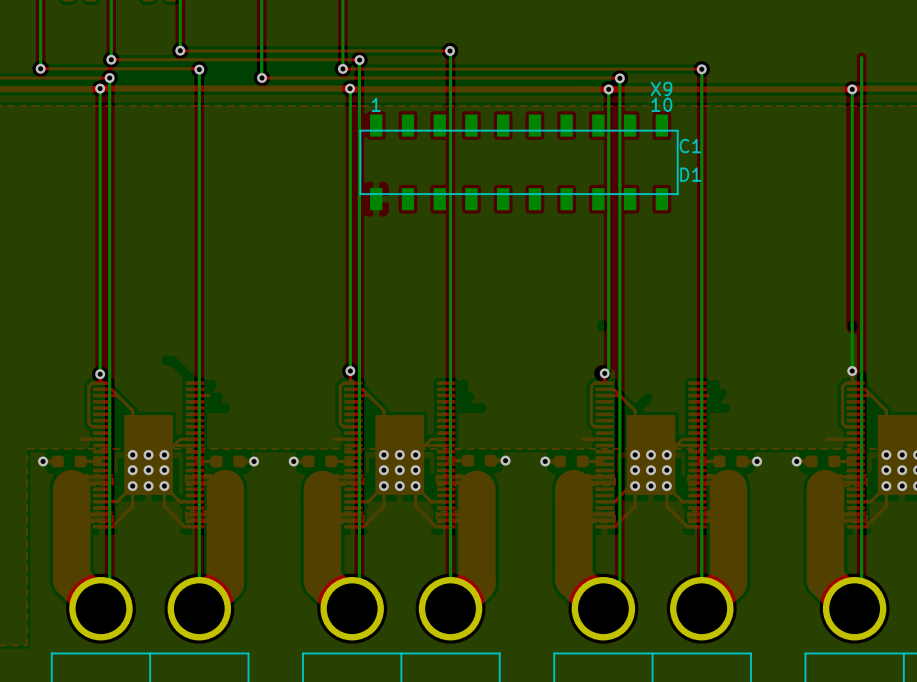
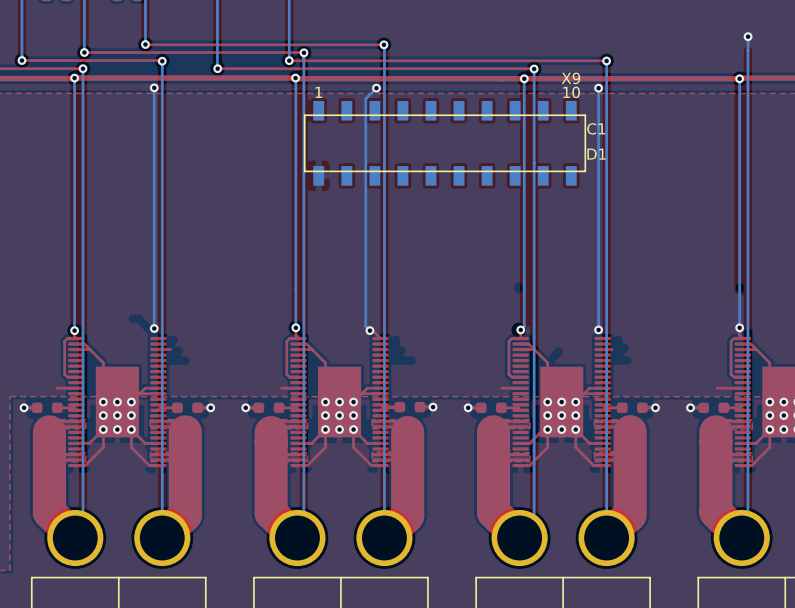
bottom track: none -> (748, 36) (748, 50)
via: none -> (748, 36)
bottom track: none -> (154, 87) (154, 328)
via: none -> (154, 87)
bottom track: none -> (376, 88) (365, 98) (365, 326) (369, 330)
via: none -> (376, 88)
bottom track: none -> (598, 88) (598, 329)
via: none -> (598, 88)
via: none -> (154, 328)
via: none -> (598, 329)
top track: none -> (369, 330) (372, 330) (380, 338)
via: none -> (369, 330)

